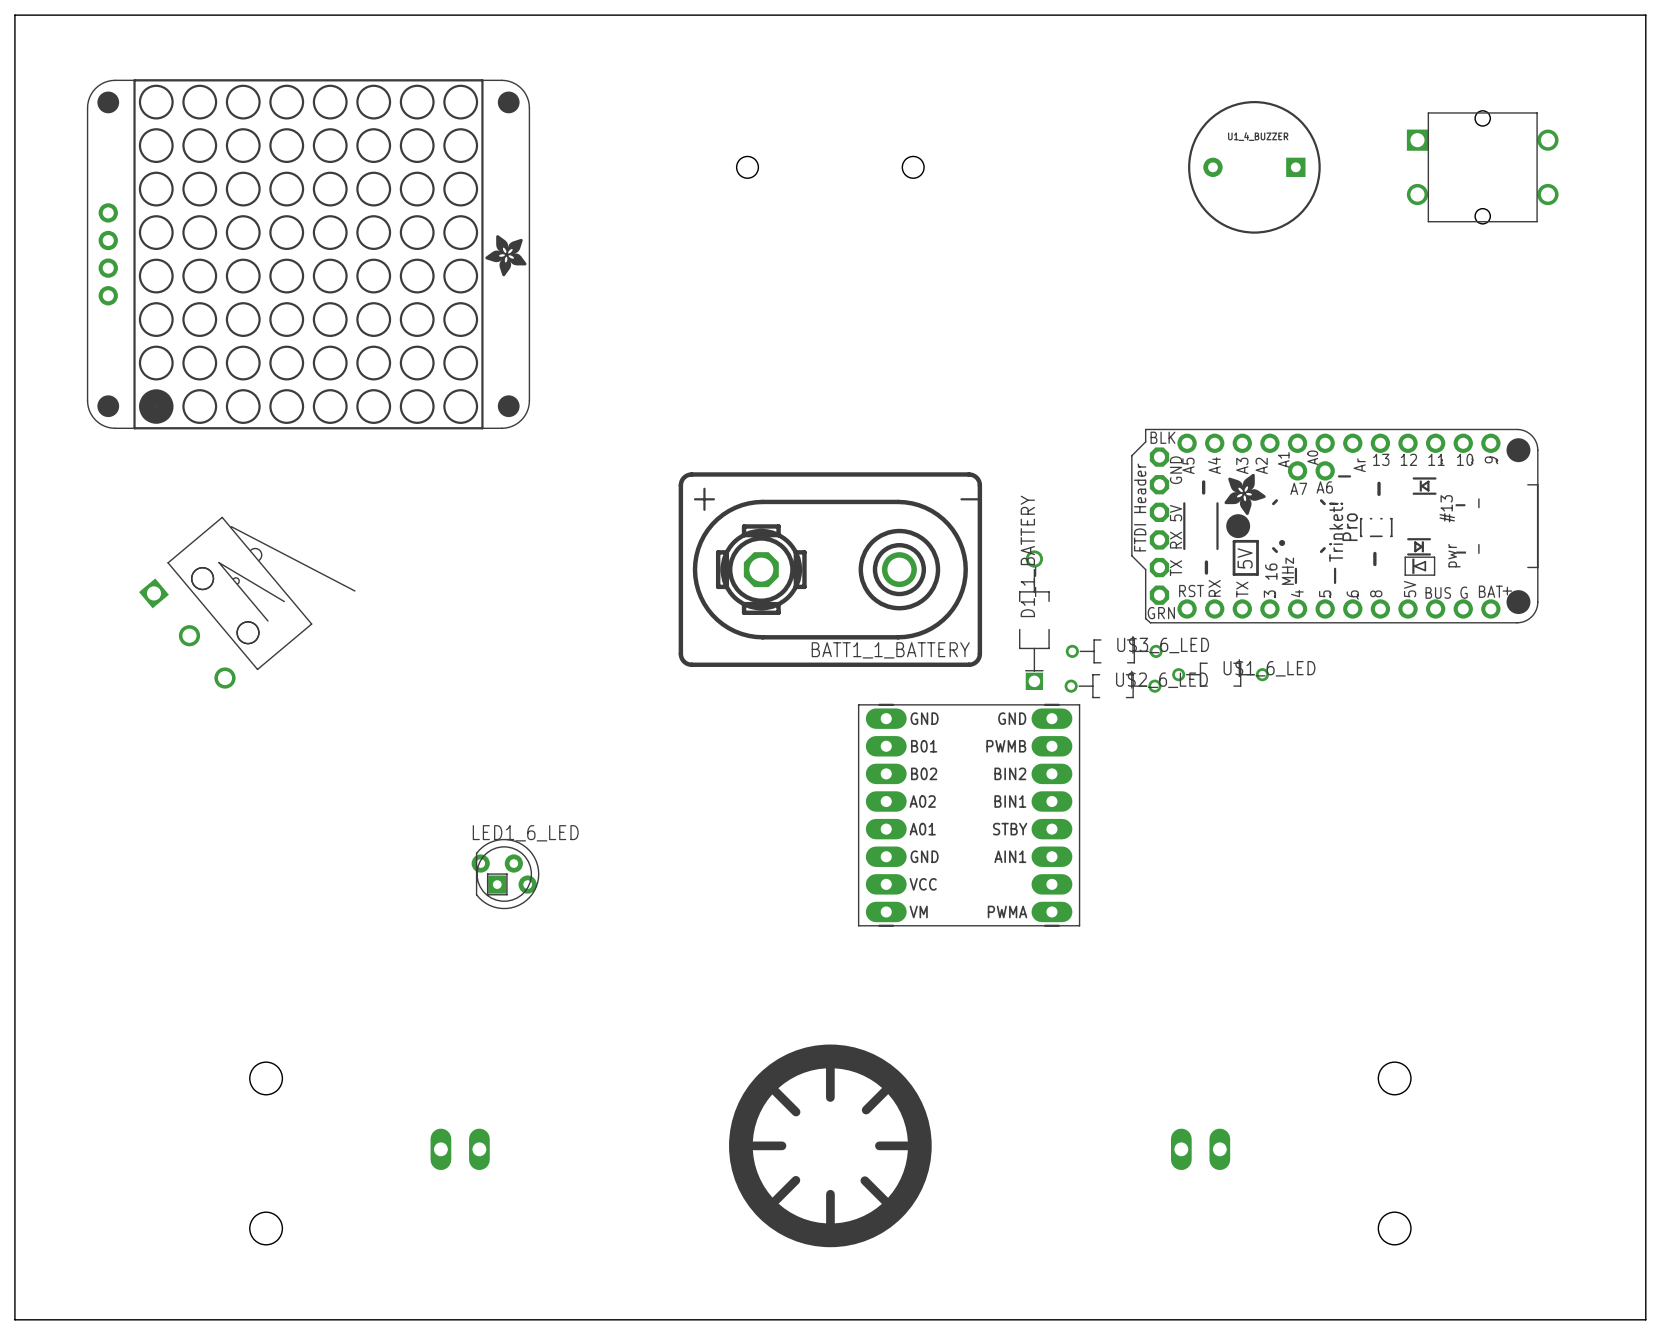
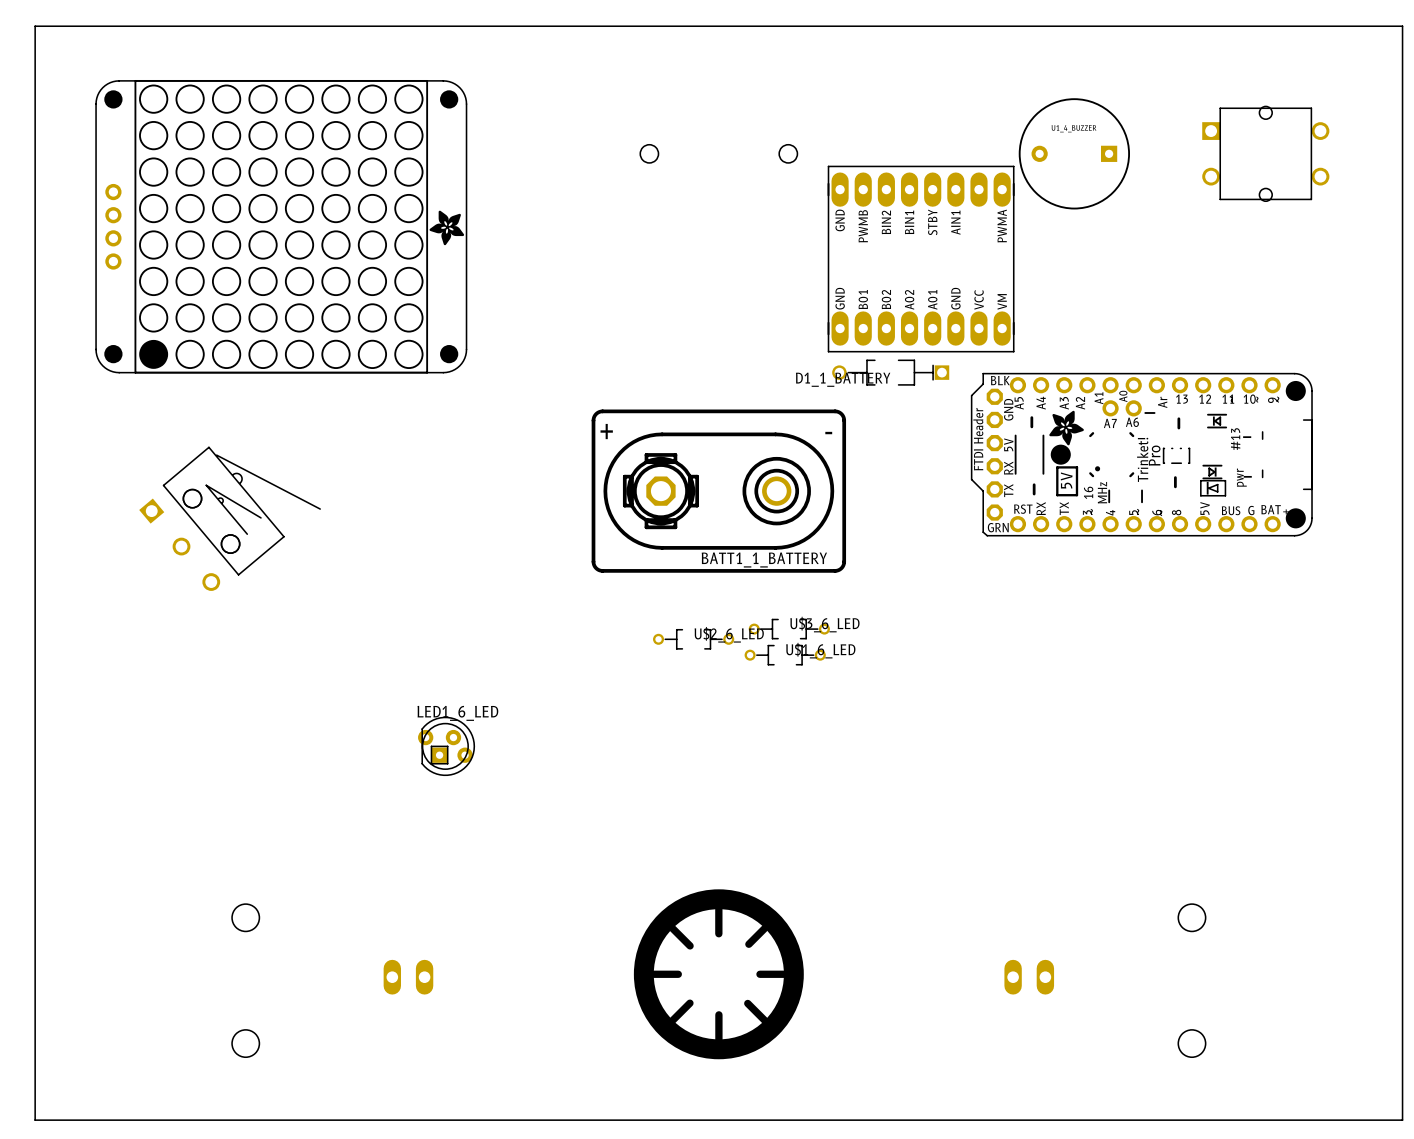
part: none -> (921, 259)
D1_1_BATTERY rotation: 0° (1034, 620) -> 90° counterclockwise (890, 372)
D1_1_BATTERY position: (1034, 620) -> (890, 372)
U$3_6_LED position: (1114, 651) -> (789, 629)
U$1_6_LED position: (1220, 674) -> (785, 655)
U$2_6_LED position: (1113, 686) -> (693, 639)
part: (969, 815) -> none

